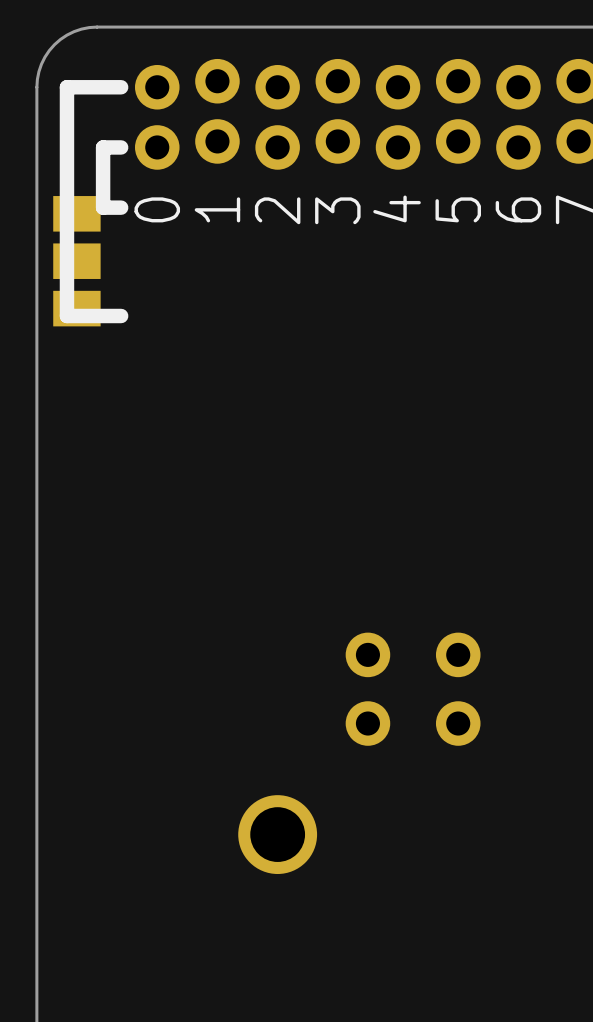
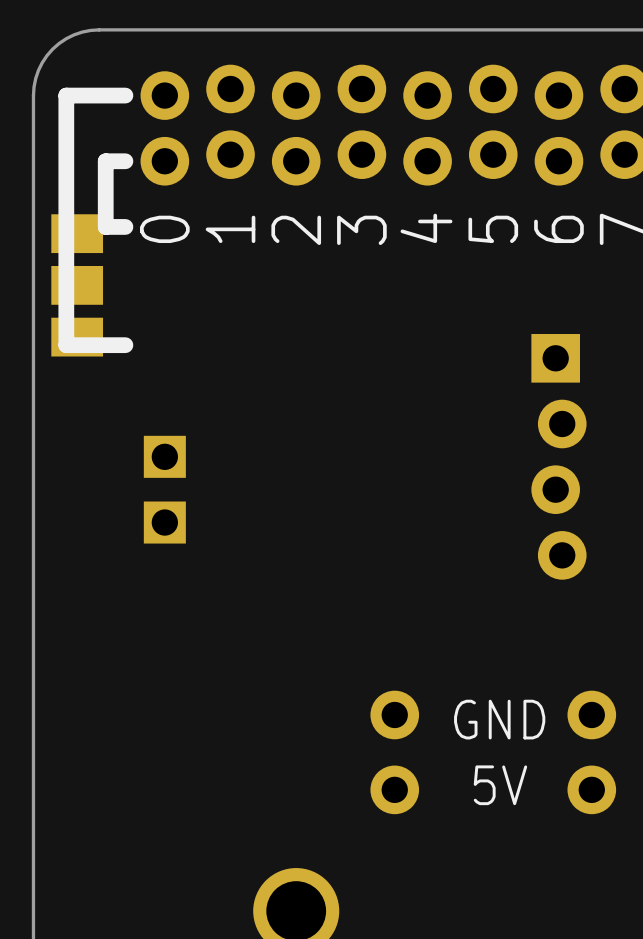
part: none -> (558, 456)
part: none -> (164, 489)
text: none -> GND (499, 719)
part position: (458, 689) -> (591, 752)
text: none -> 5V (500, 785)

